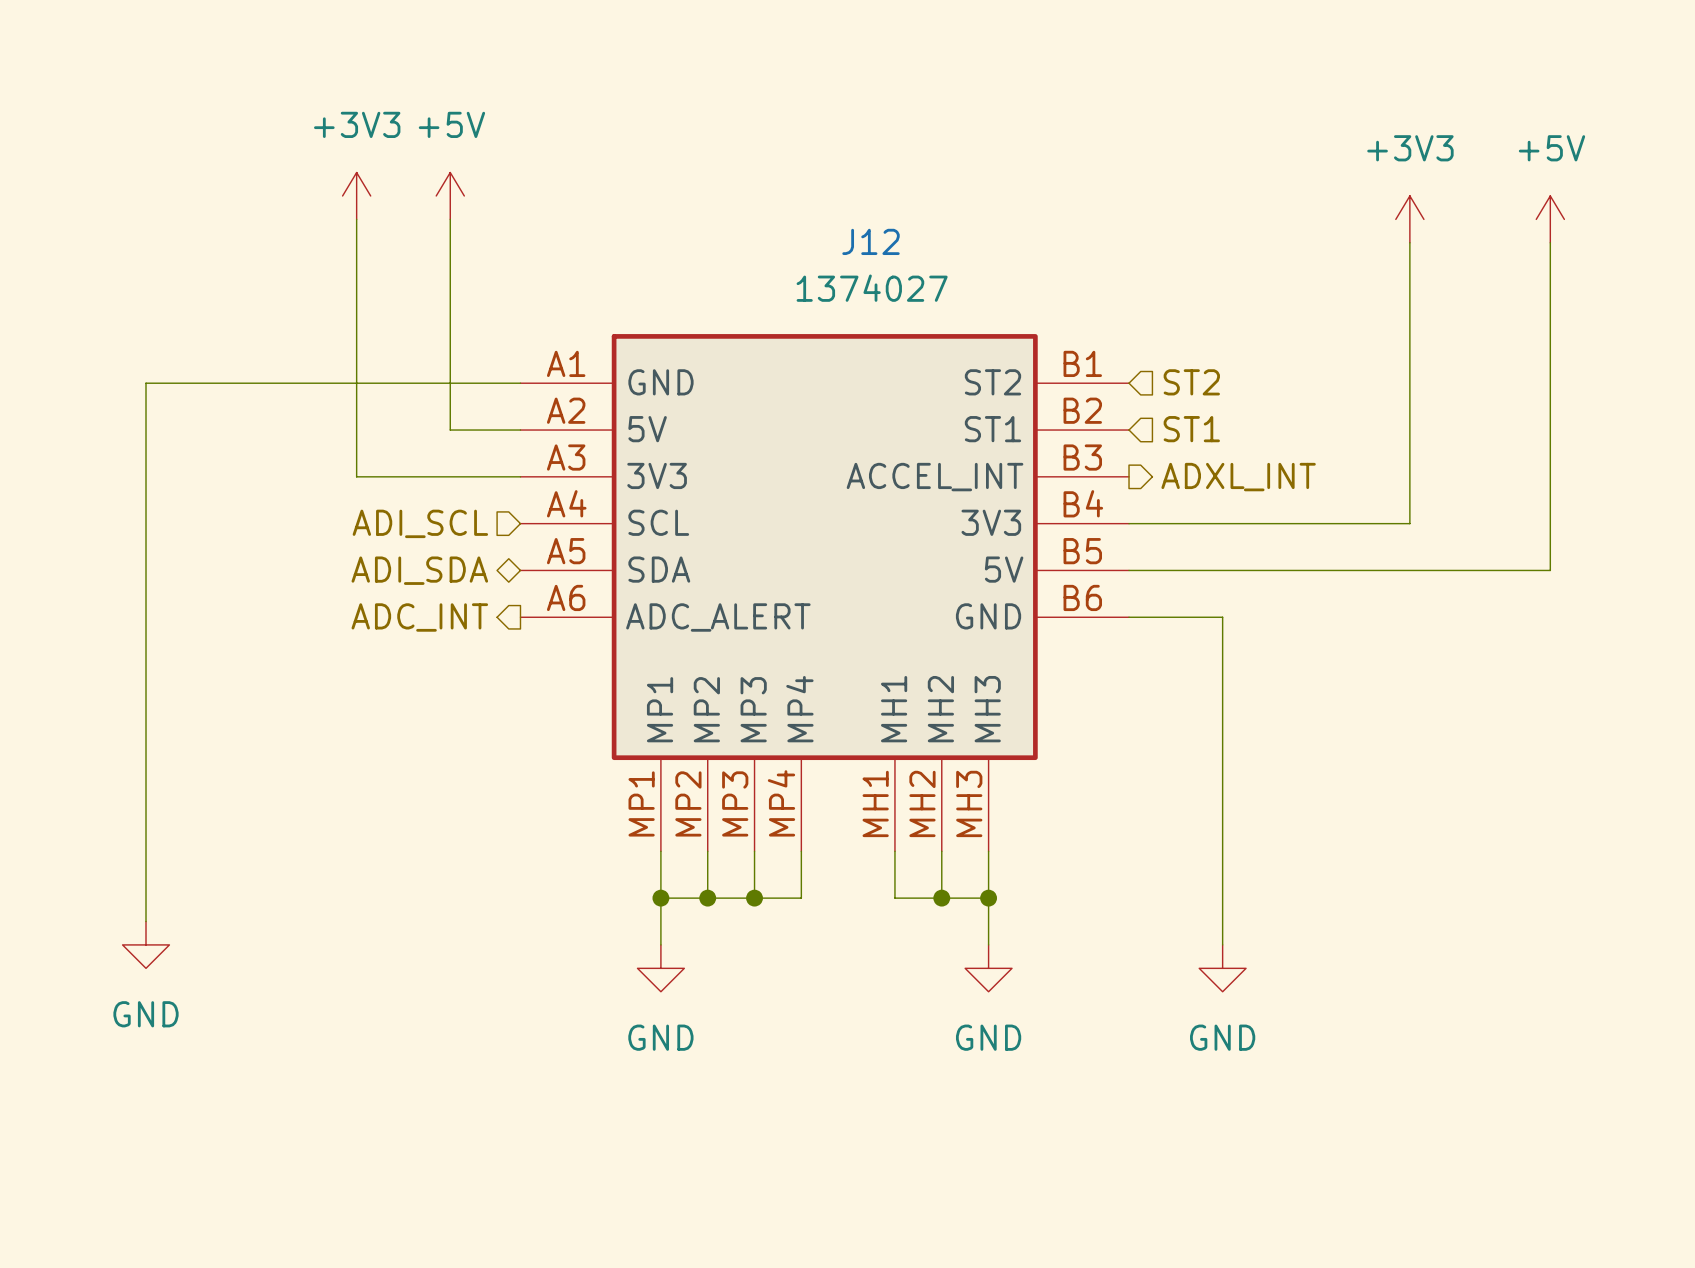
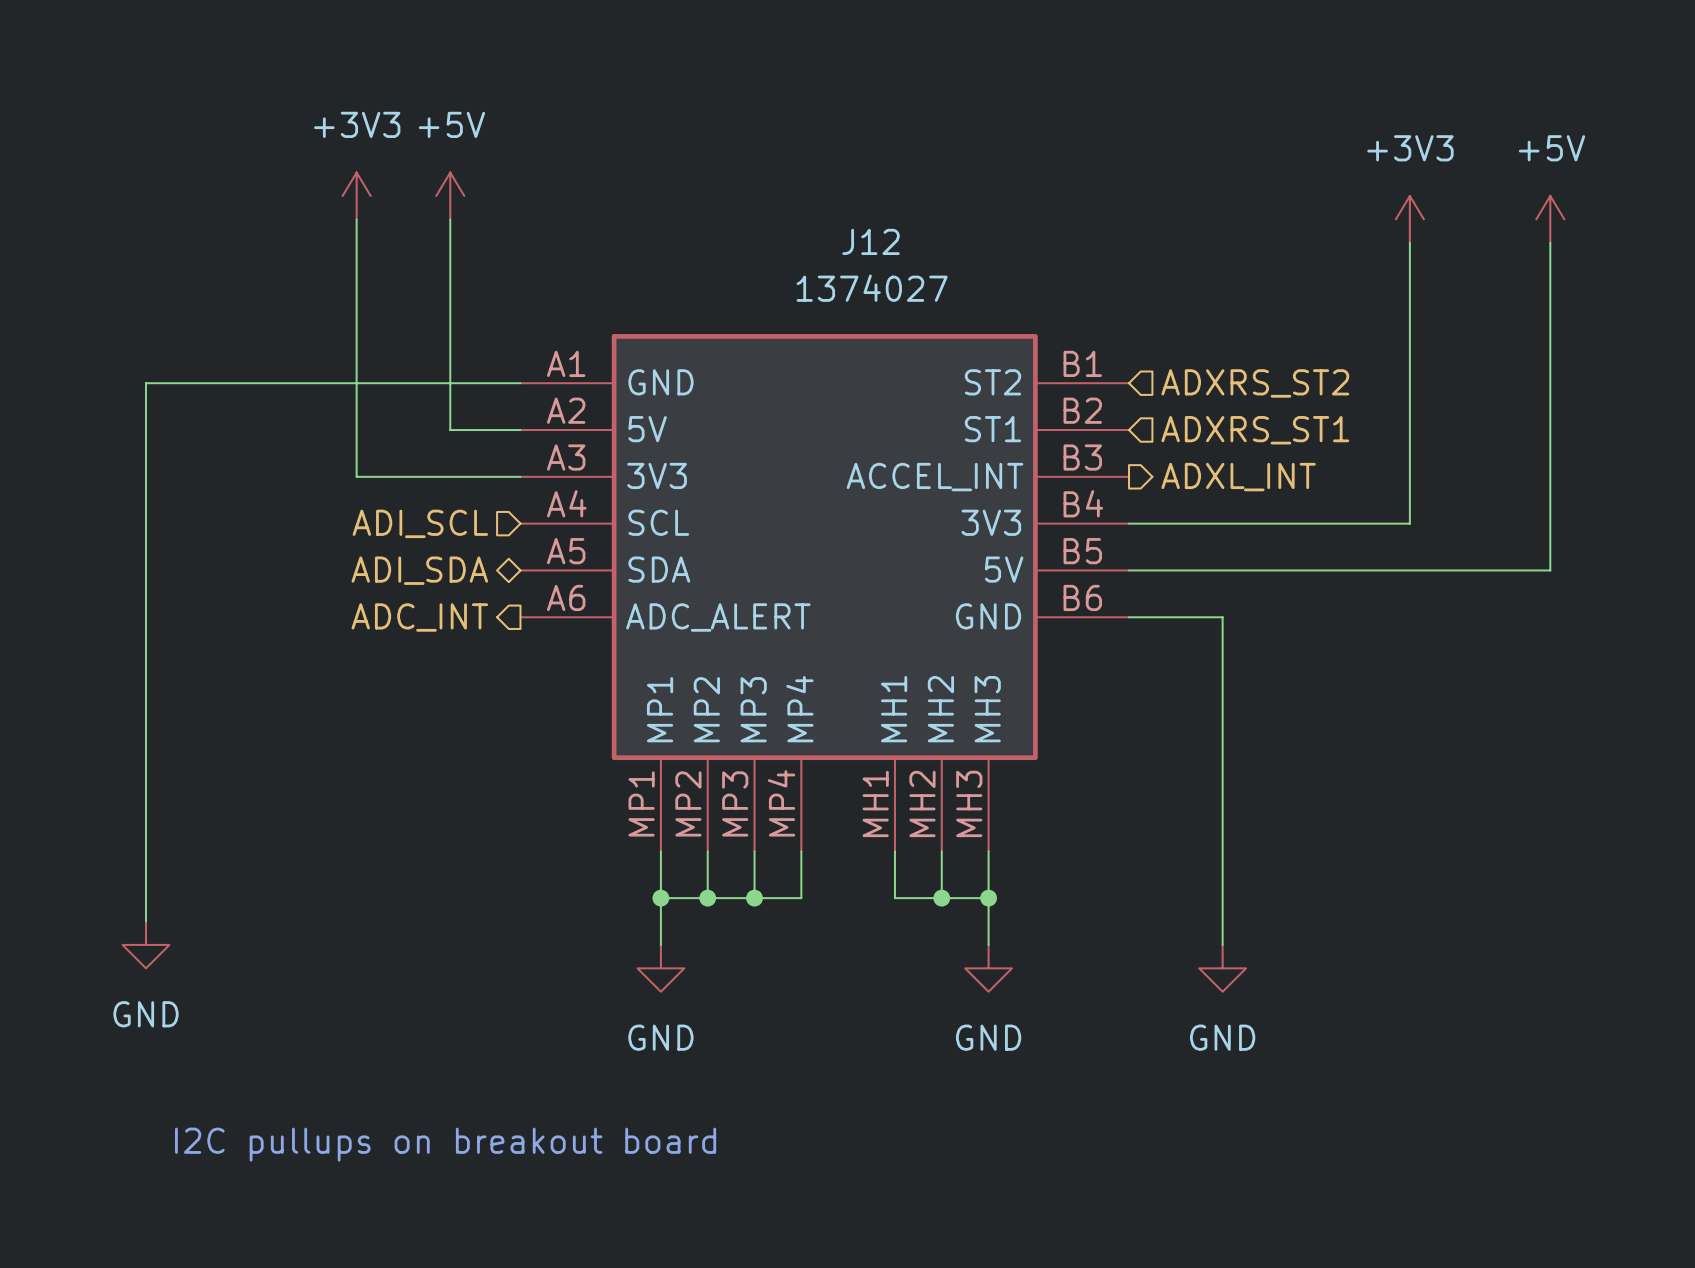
hierarchical label: ST2 (1191, 382) -> ADXRS_ST2 (1255, 383)
hierarchical label: ST1 (1191, 429) -> ADXRS_ST1 (1255, 430)
text: none -> I2C pullups on breakout board (445, 1144)

